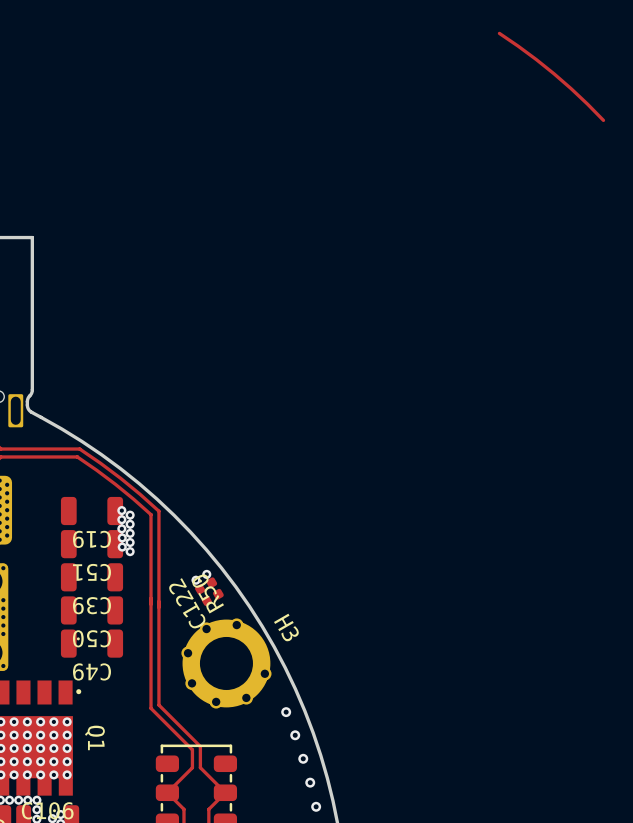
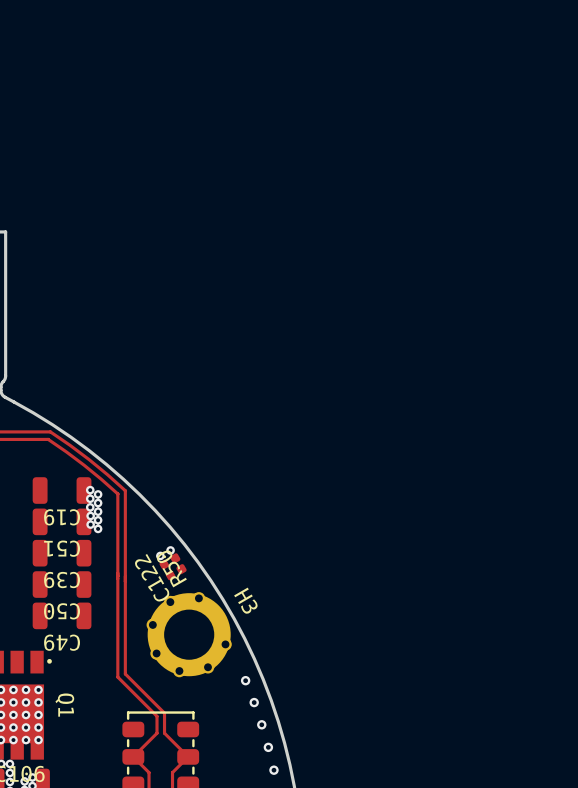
track: (499, 33) (554, 73) (603, 120) -> none

